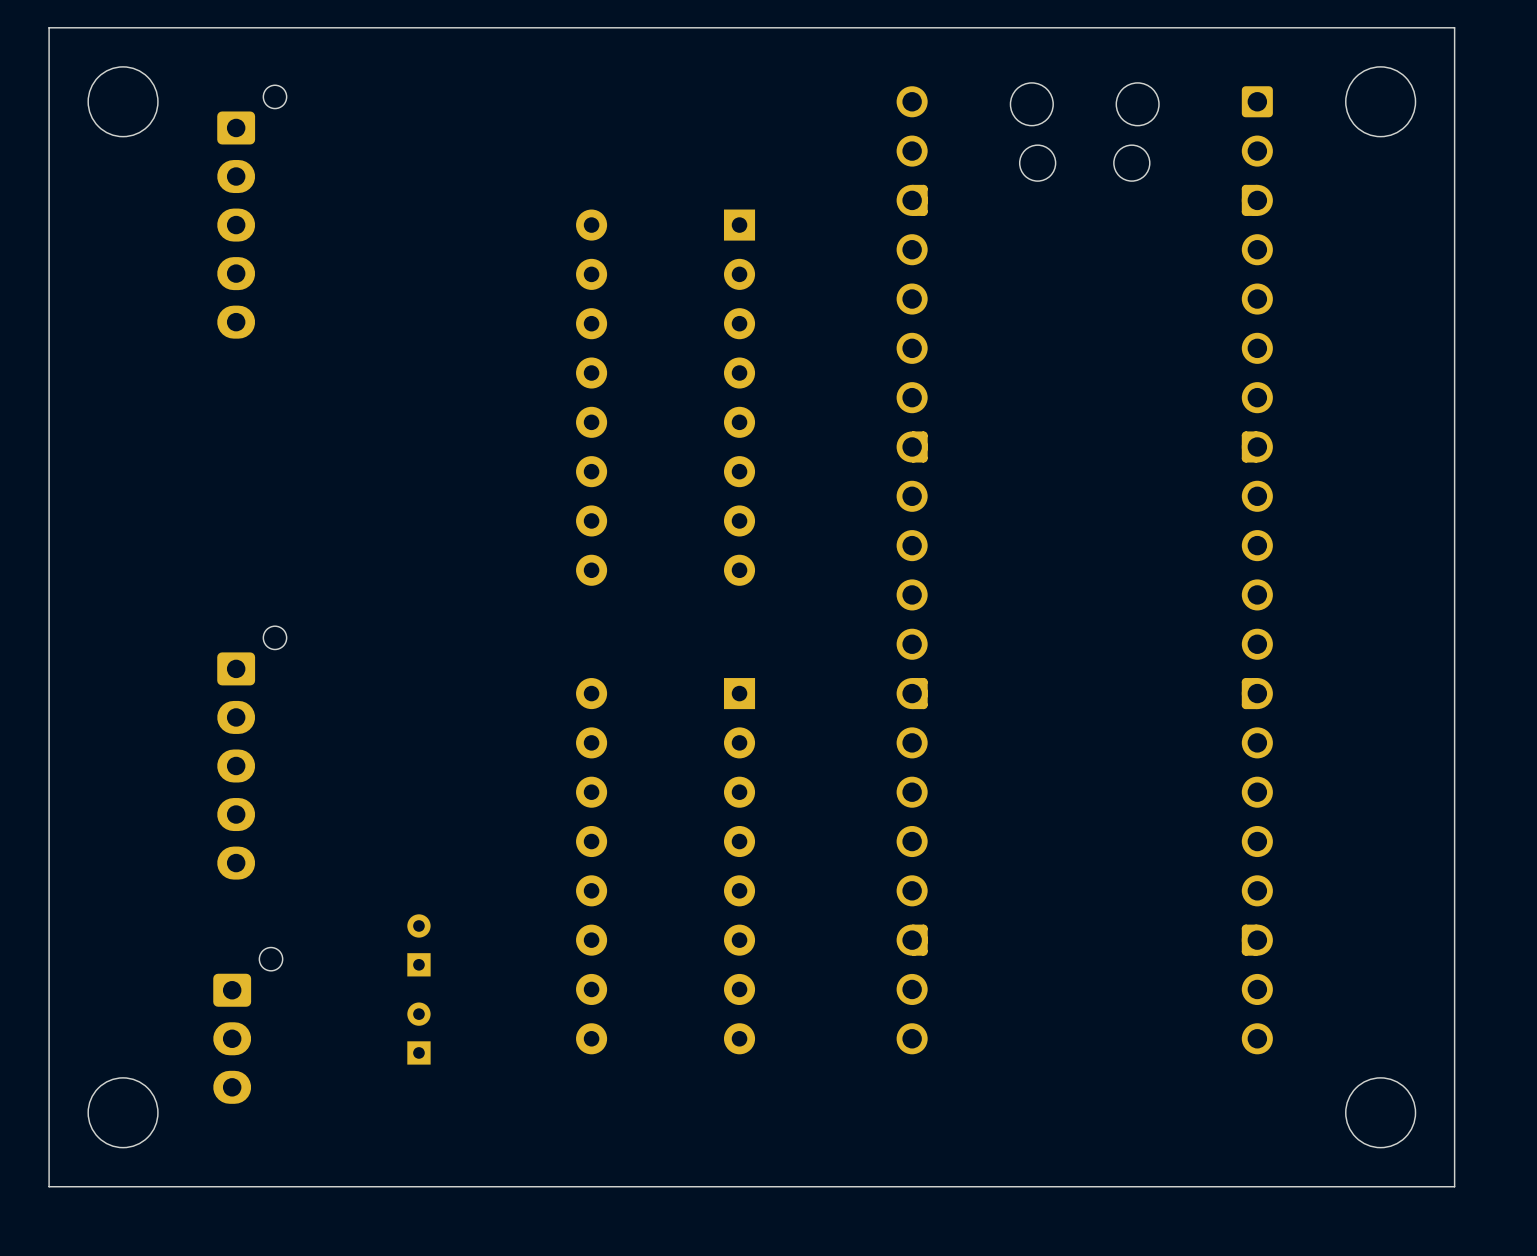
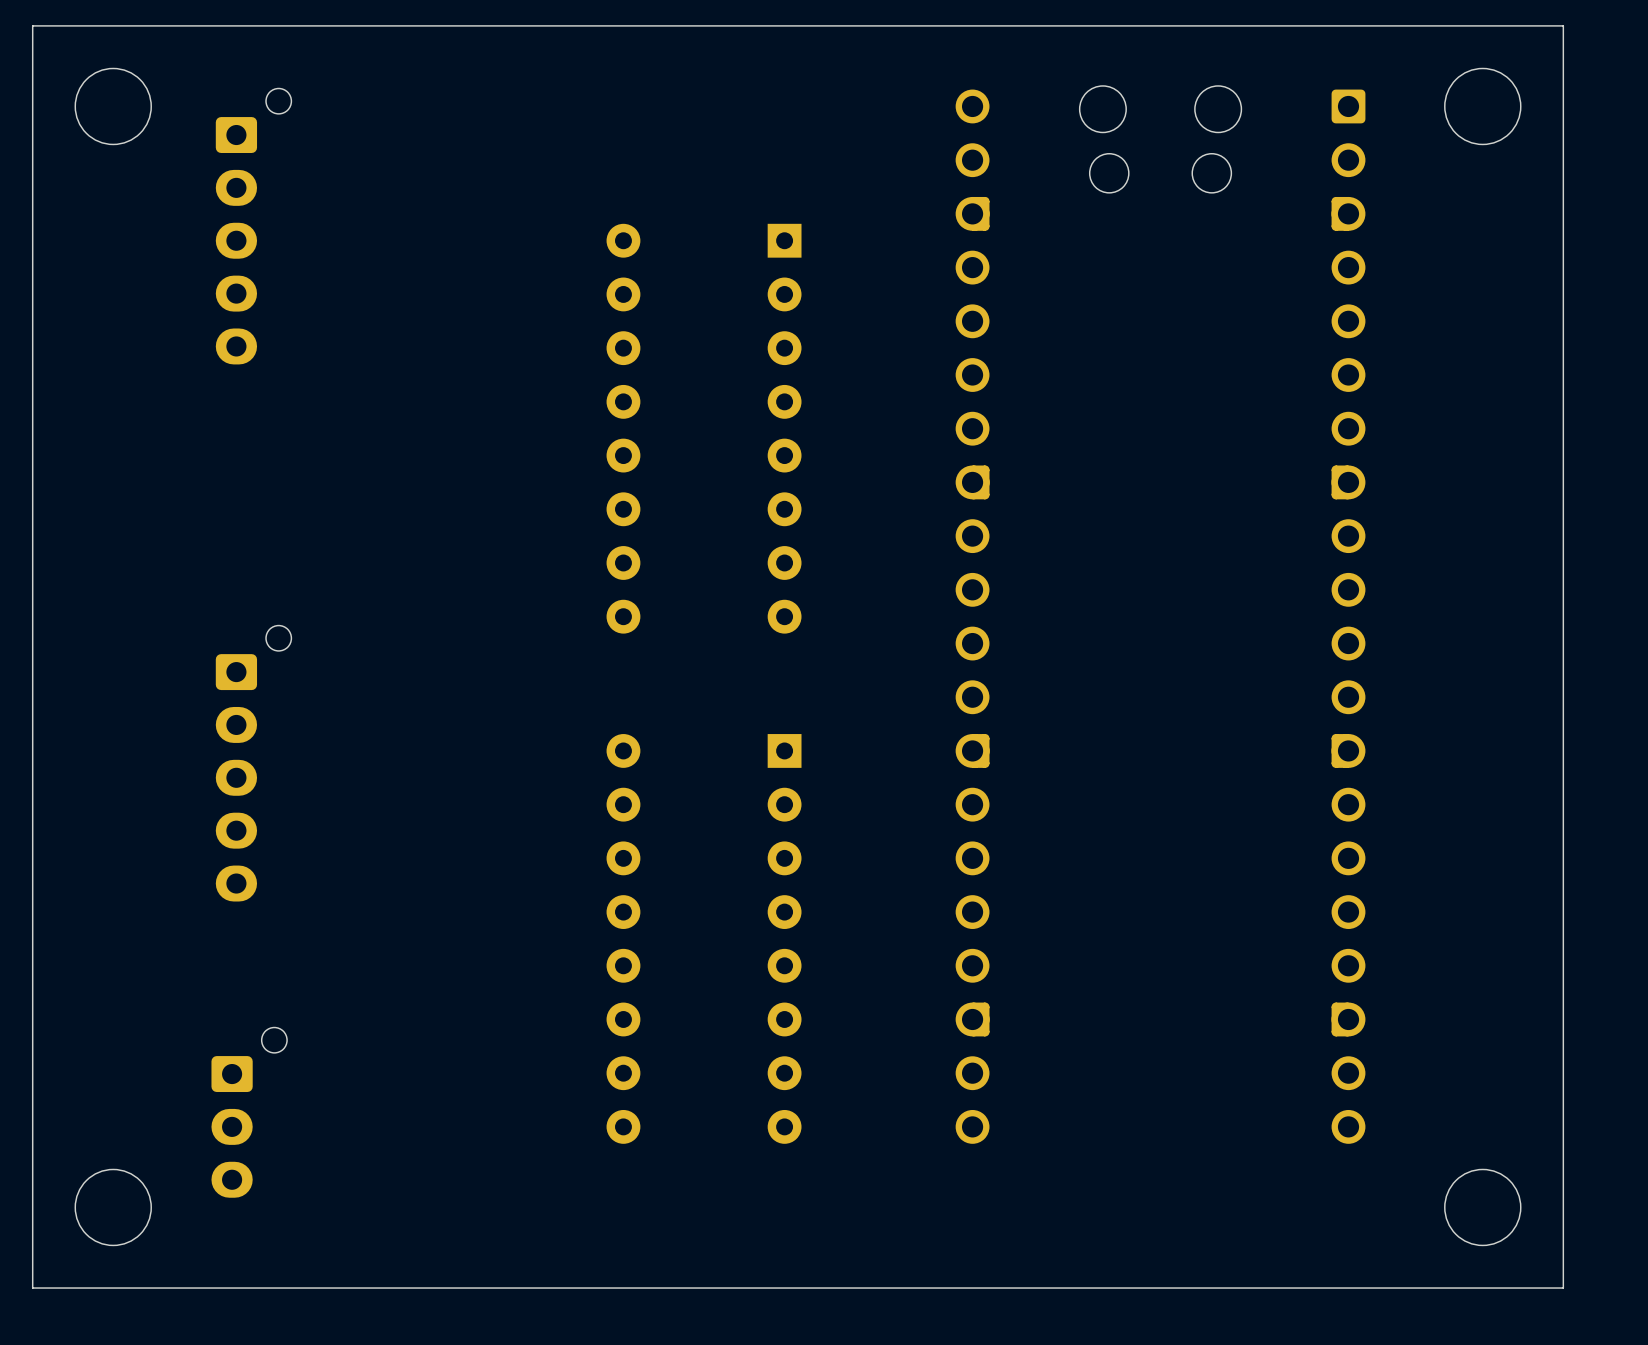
part position: (251, 752) -> (253, 763)
part: (418, 945) -> none
part: (418, 1033) -> none

